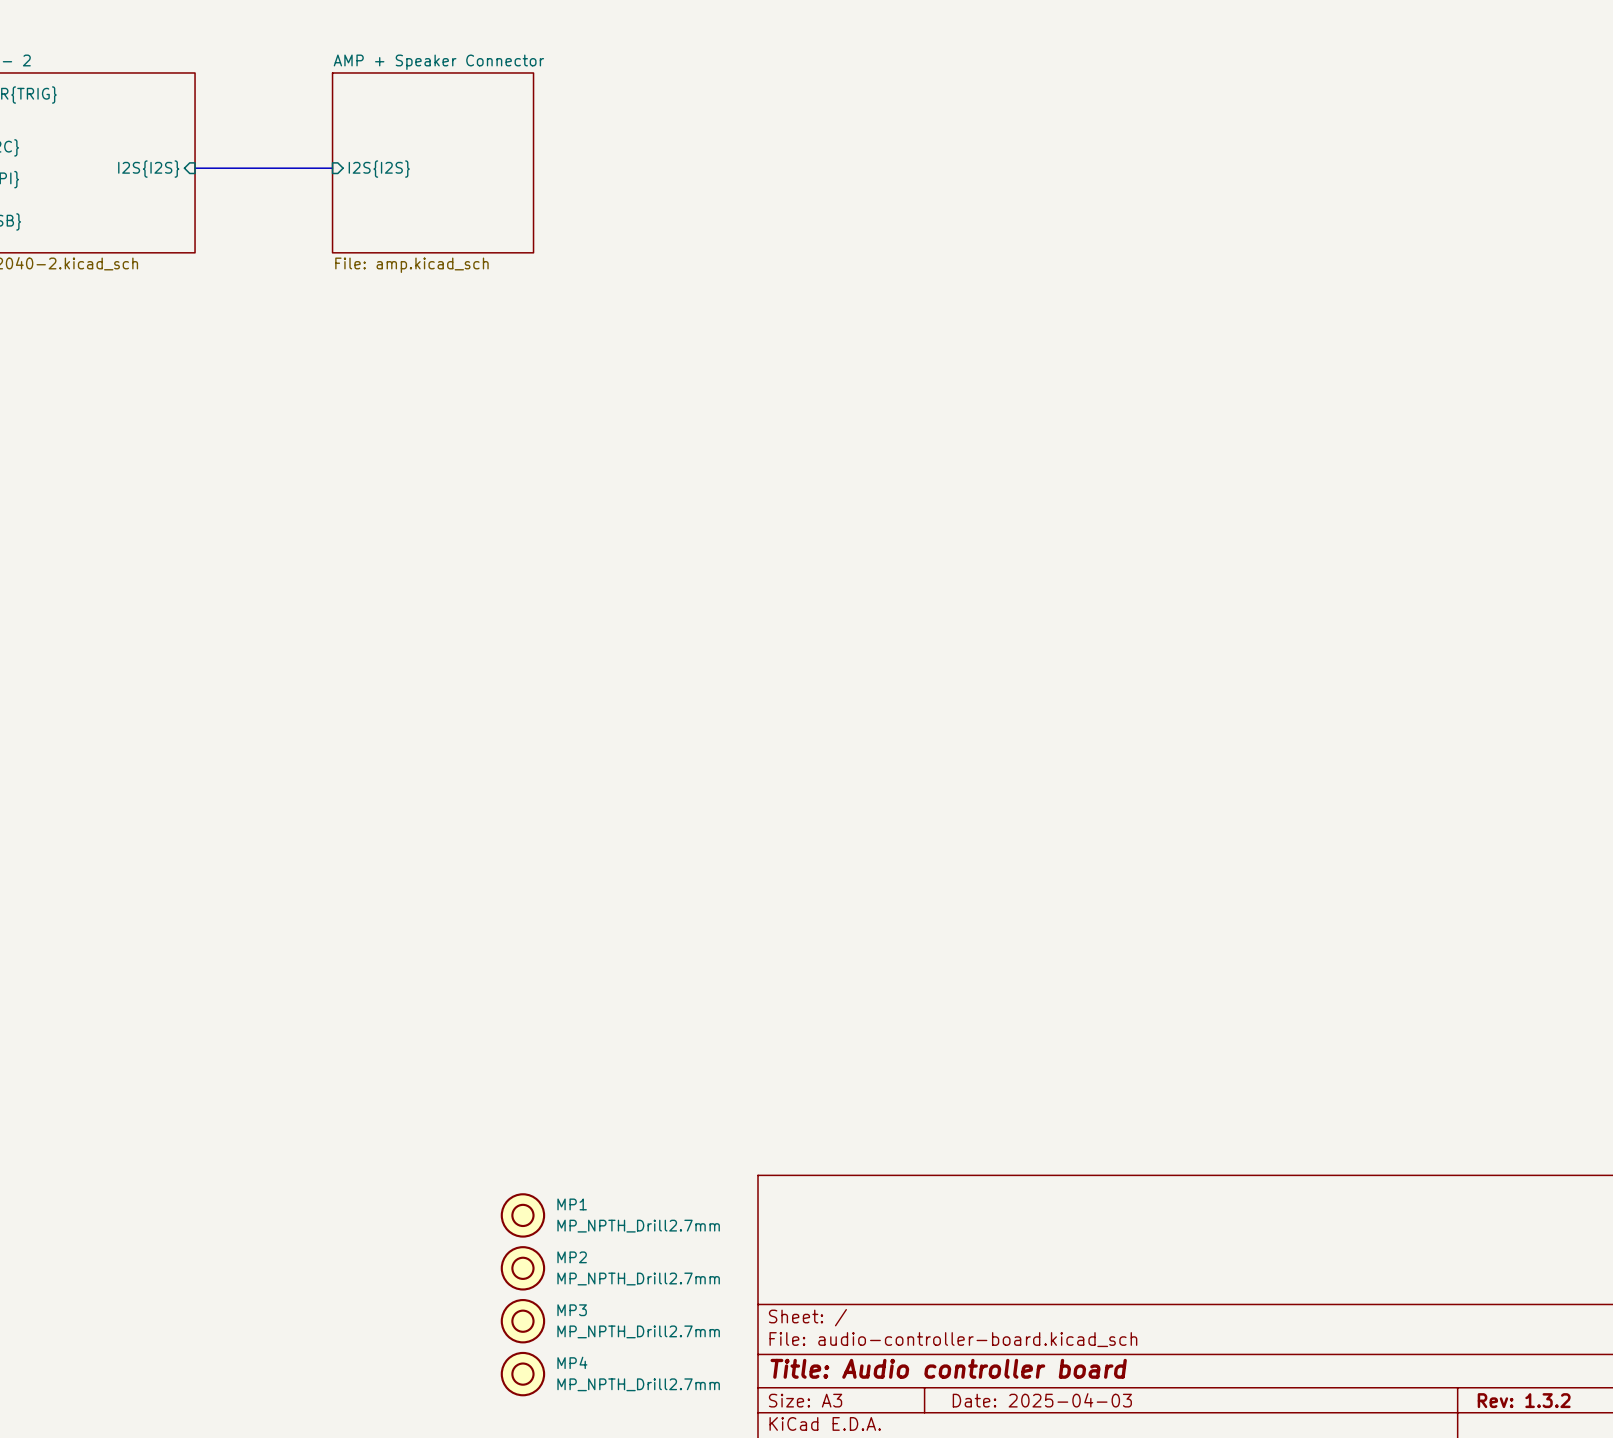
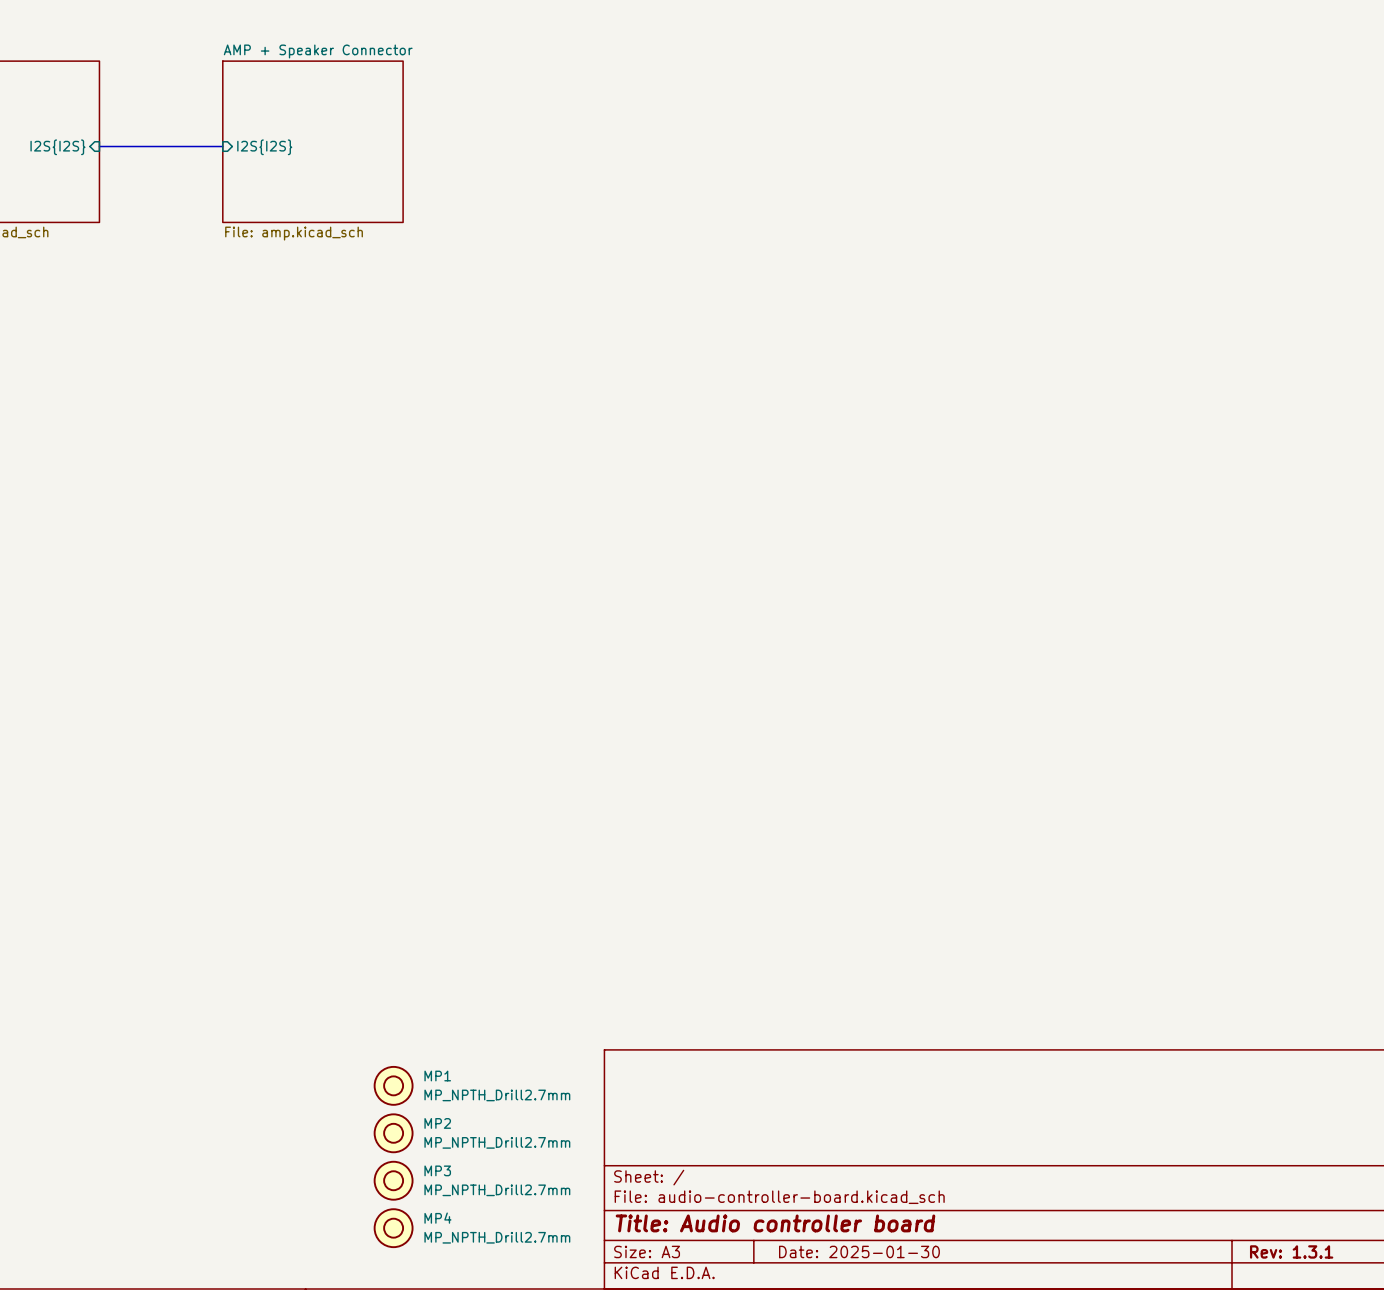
title block: Date: 2025-04-03 (1042, 1400) -> Date: 2025-01-30 (859, 1251)
title block: Rev: 1.3.2 (1524, 1400) -> Rev: 1.3.1 (1291, 1251)

